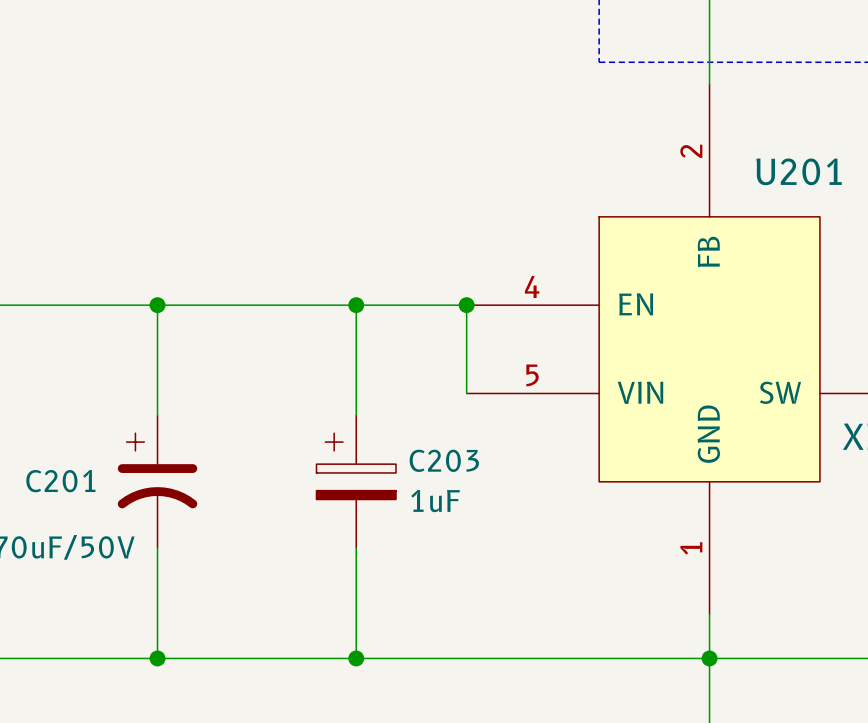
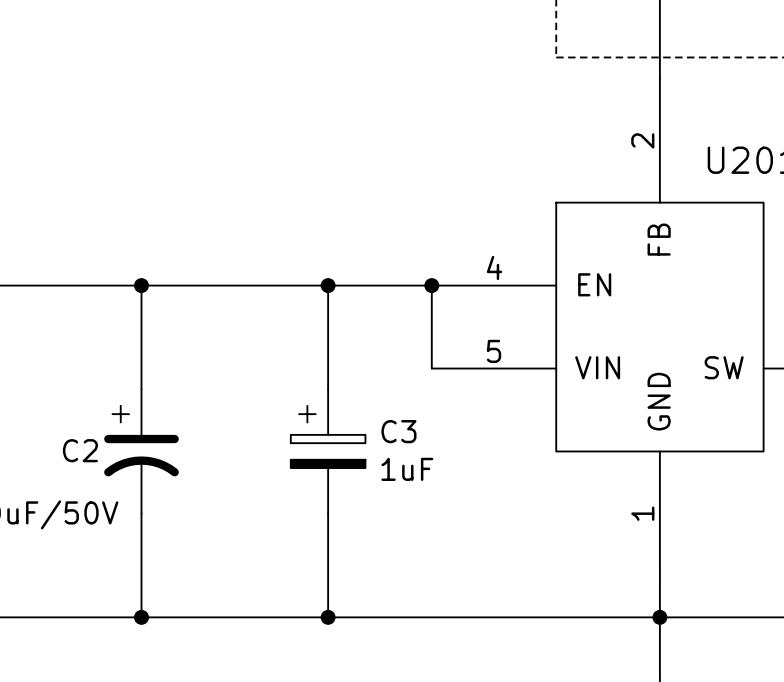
C203 name: C203 (444, 460) -> C3 (398, 431)
C201 name: C201 (60, 481) -> C2 (80, 450)

